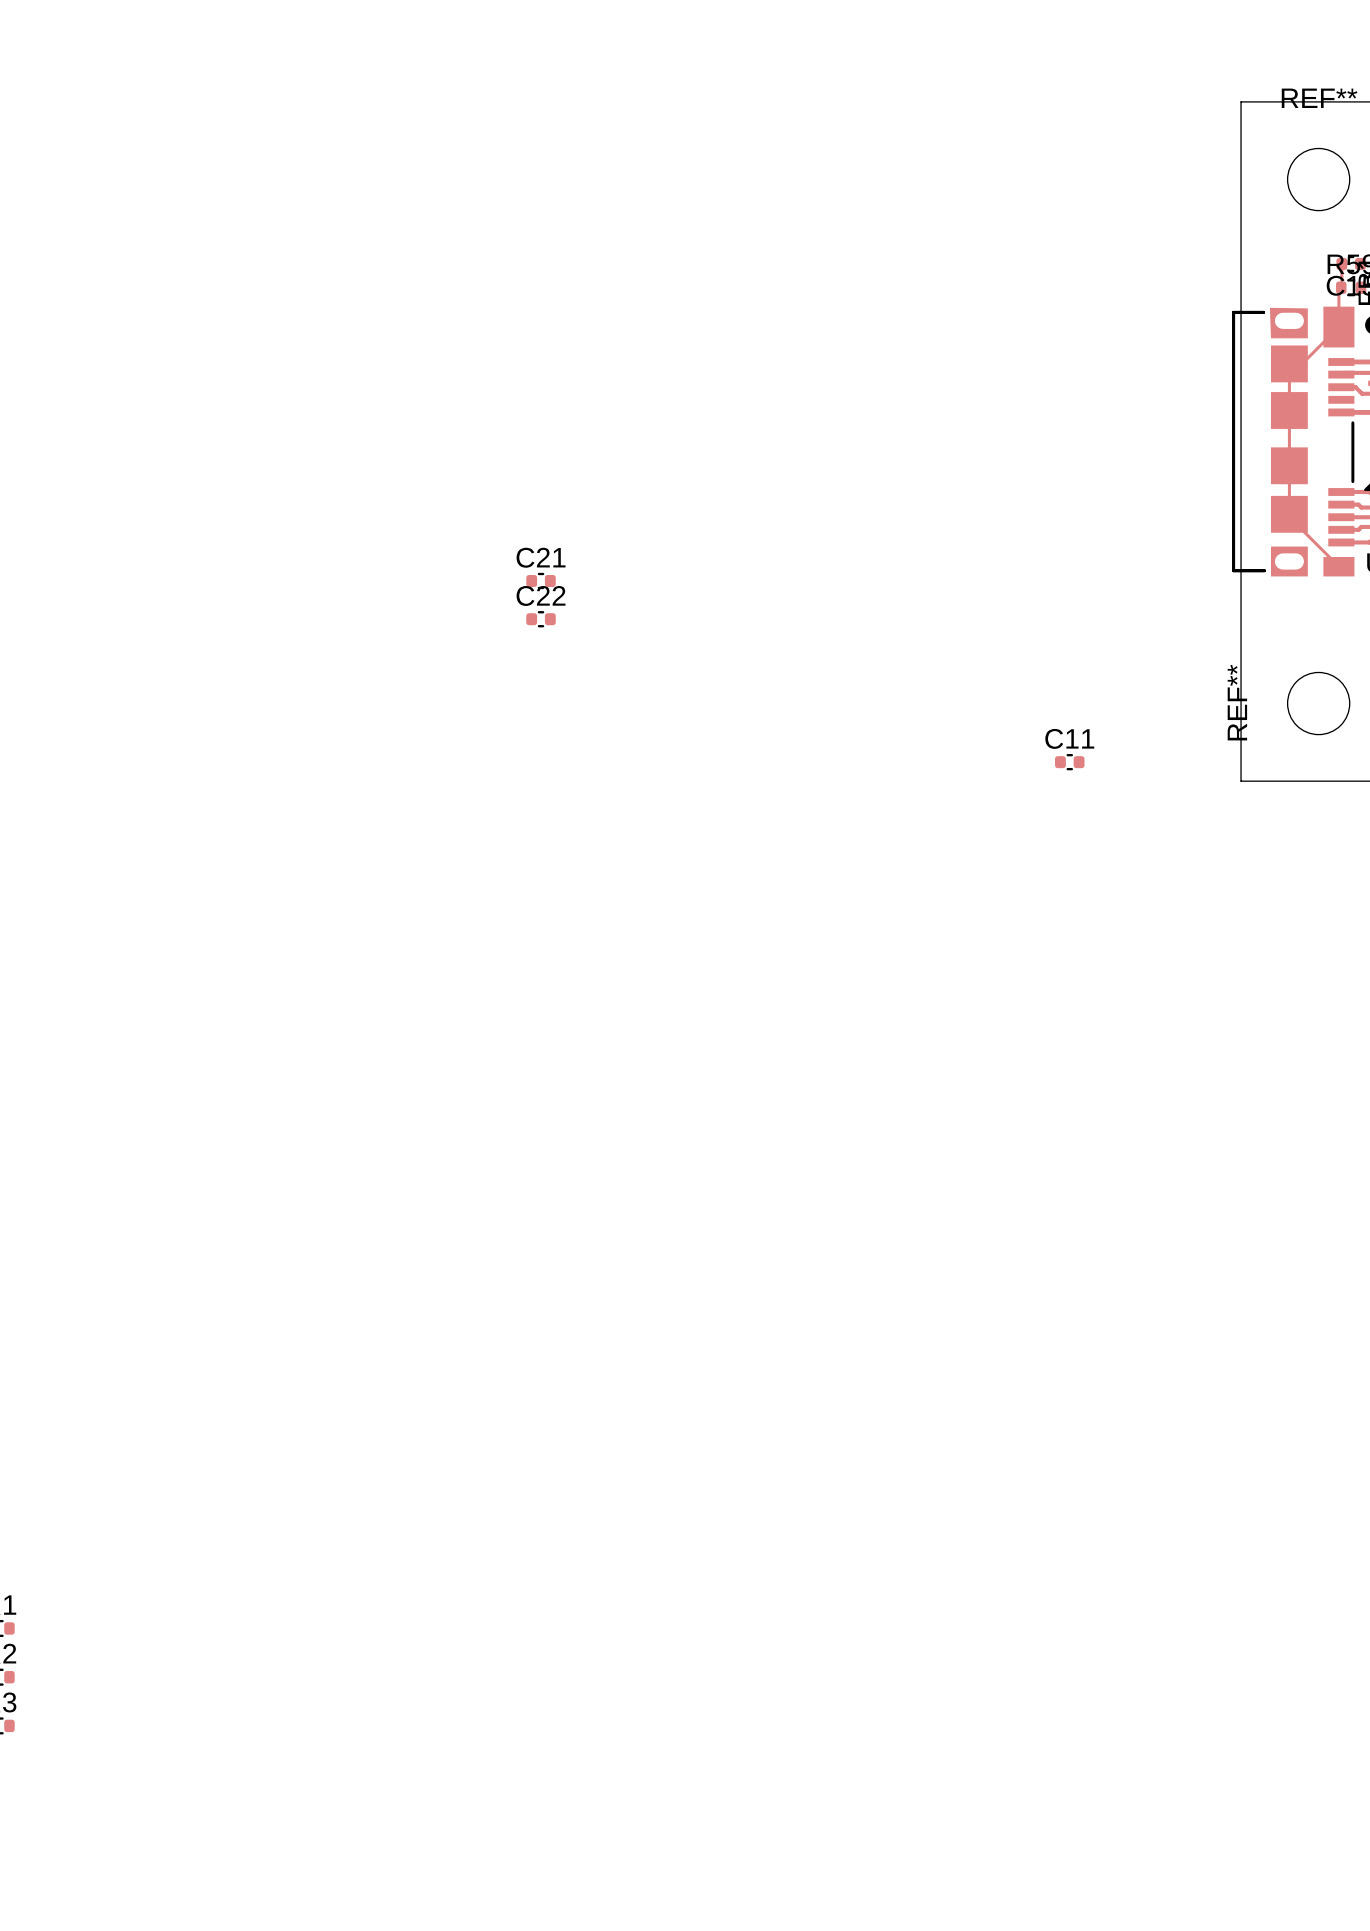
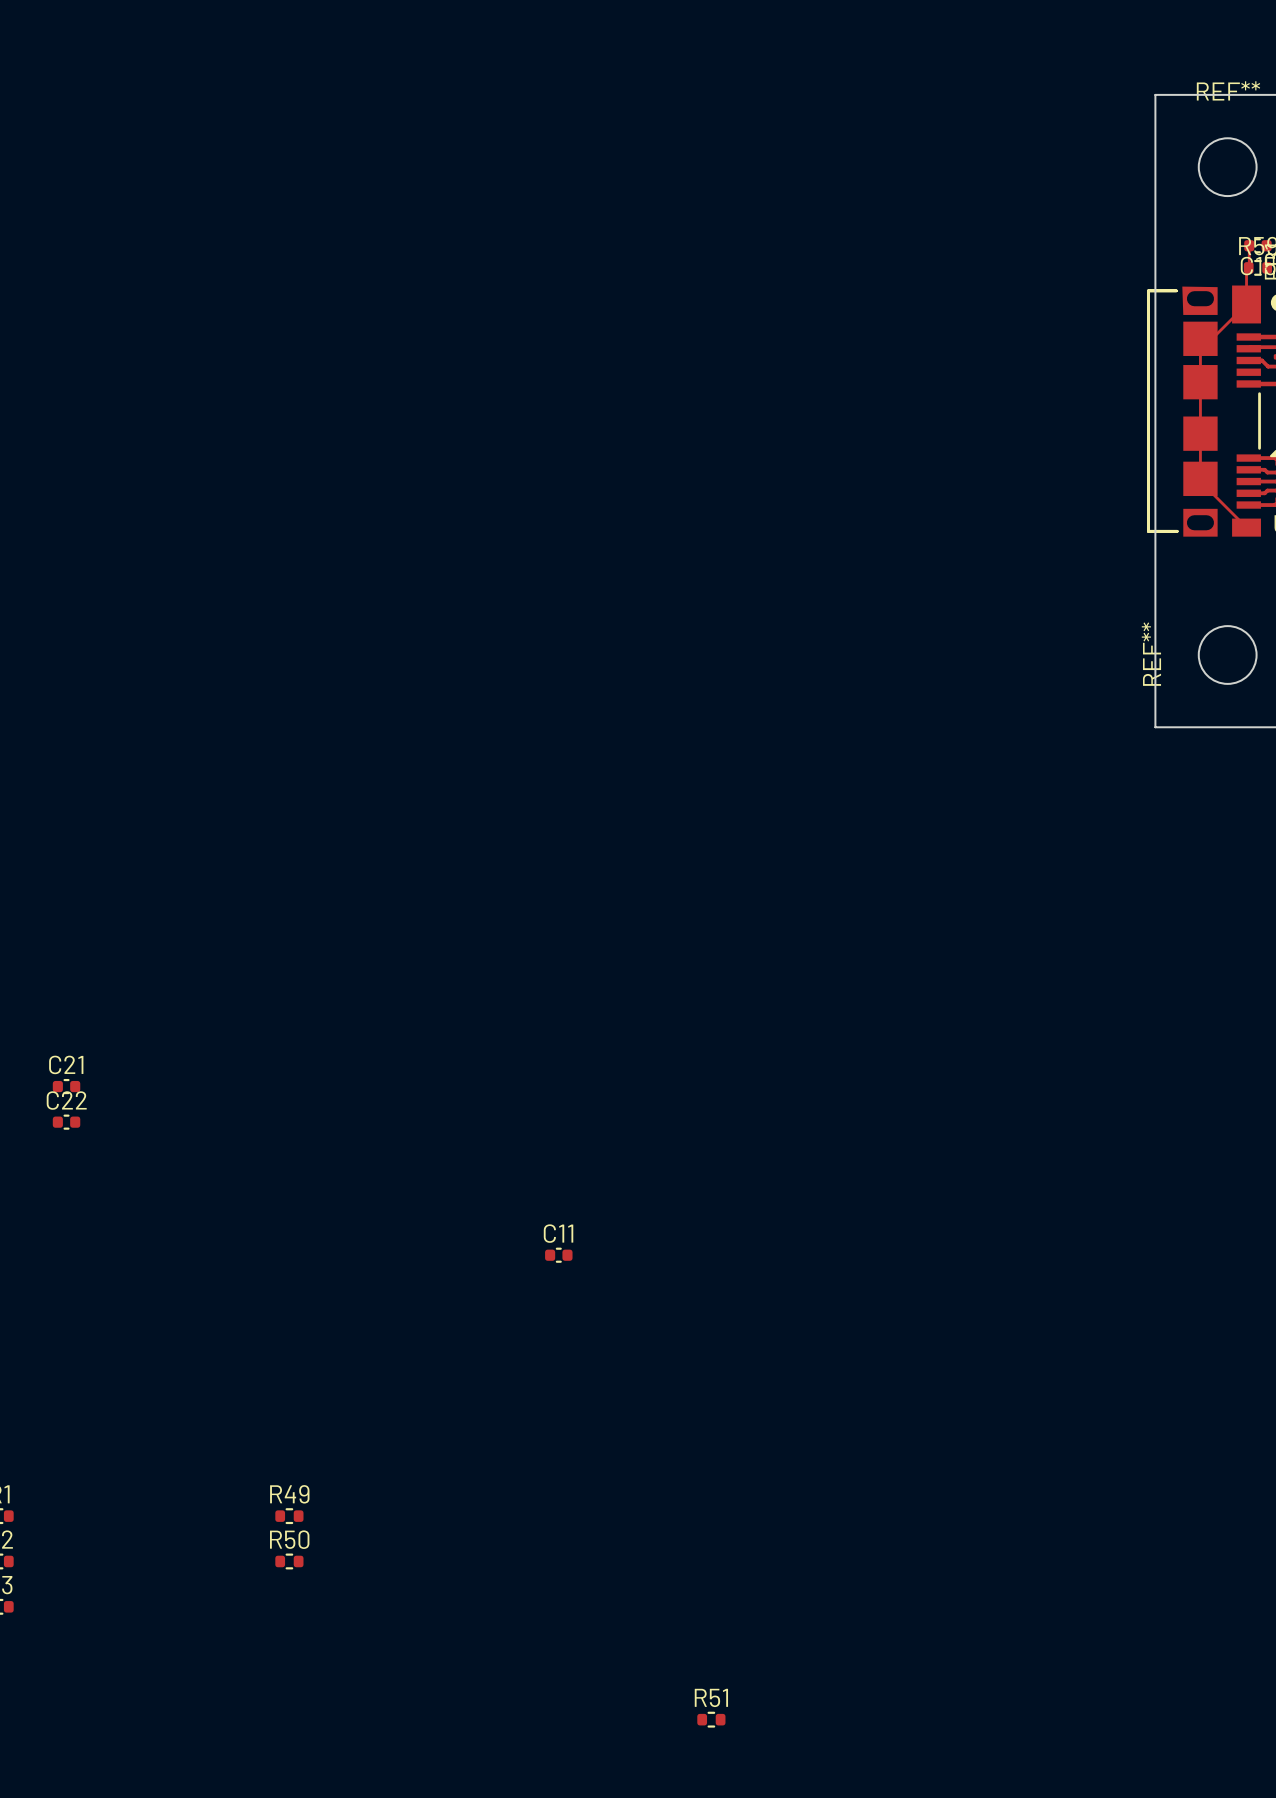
C21 position: (541, 580) -> (66, 1086)
C22 position: (541, 619) -> (66, 1122)
C11 position: (1069, 762) -> (558, 1255)
R49: none -> (289, 1516)
R50: none -> (289, 1561)
R51: none -> (711, 1719)

